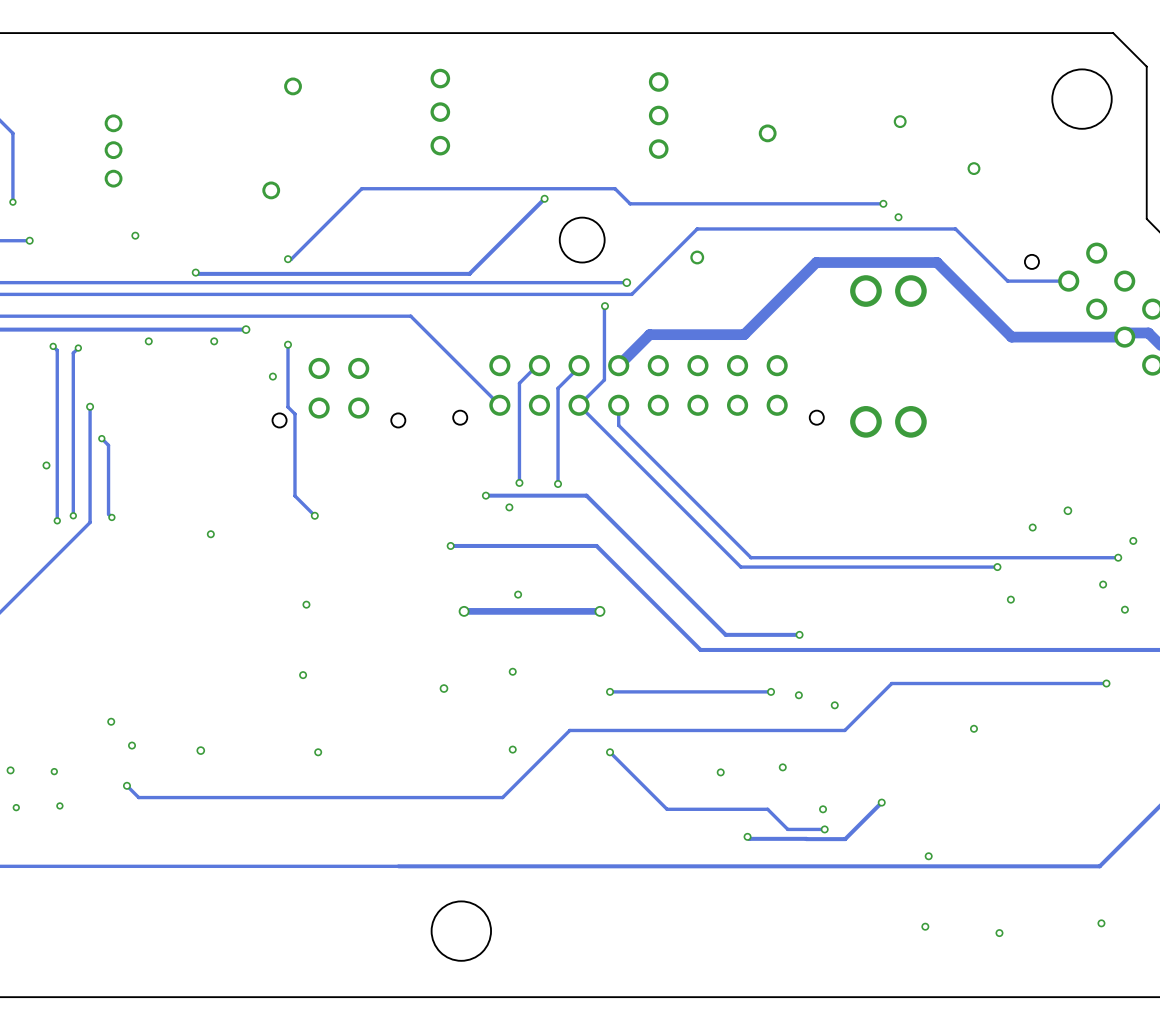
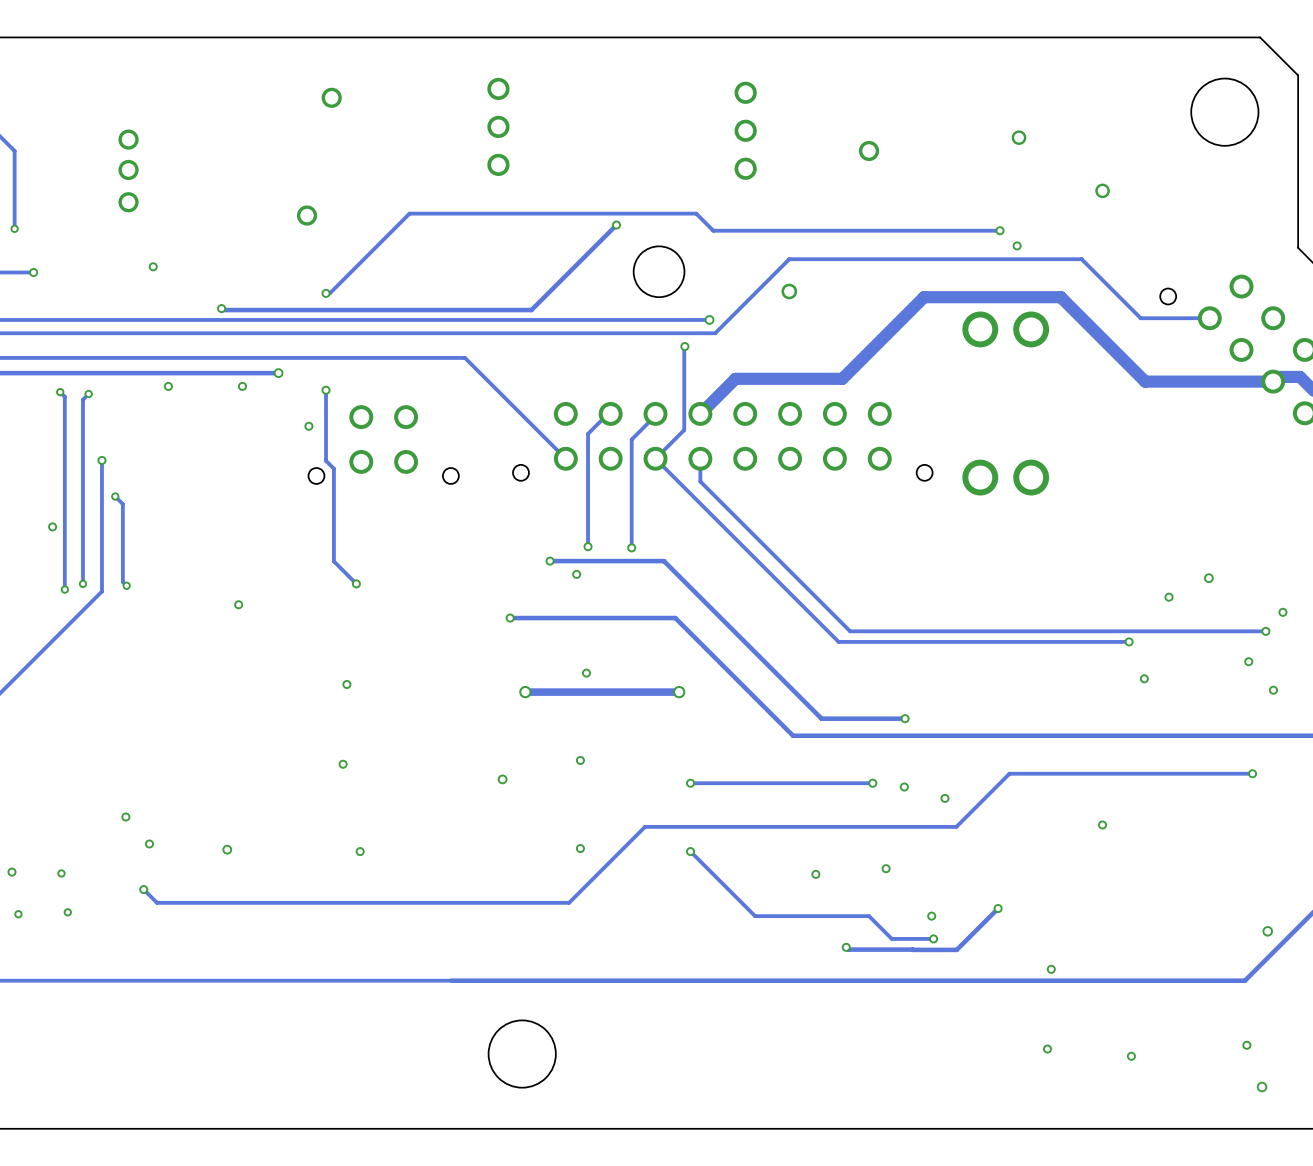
via: none -> (1267, 931)
via: none -> (1262, 1087)

